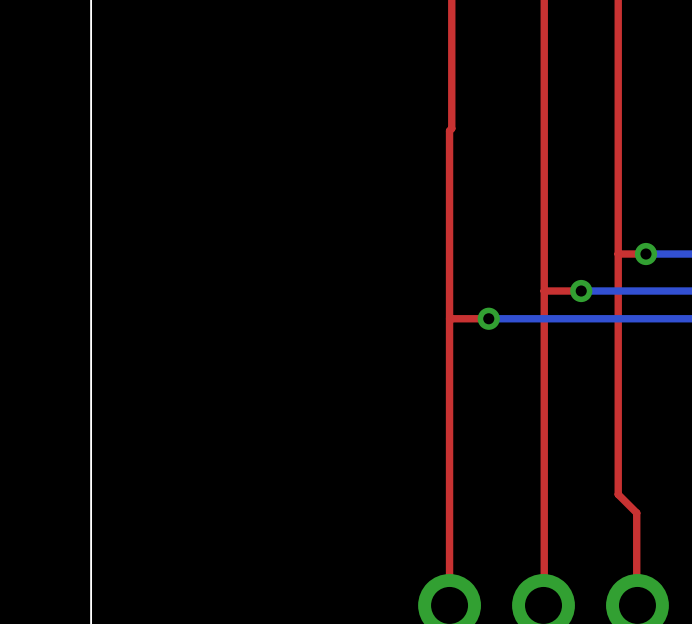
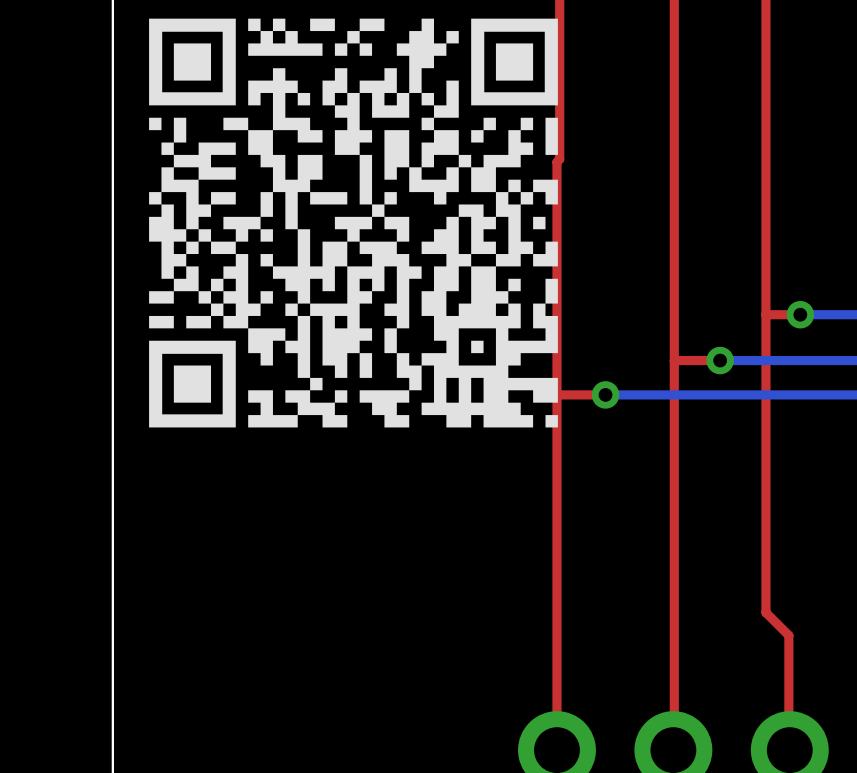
drawing: none -> [149, 18, 558, 428]

